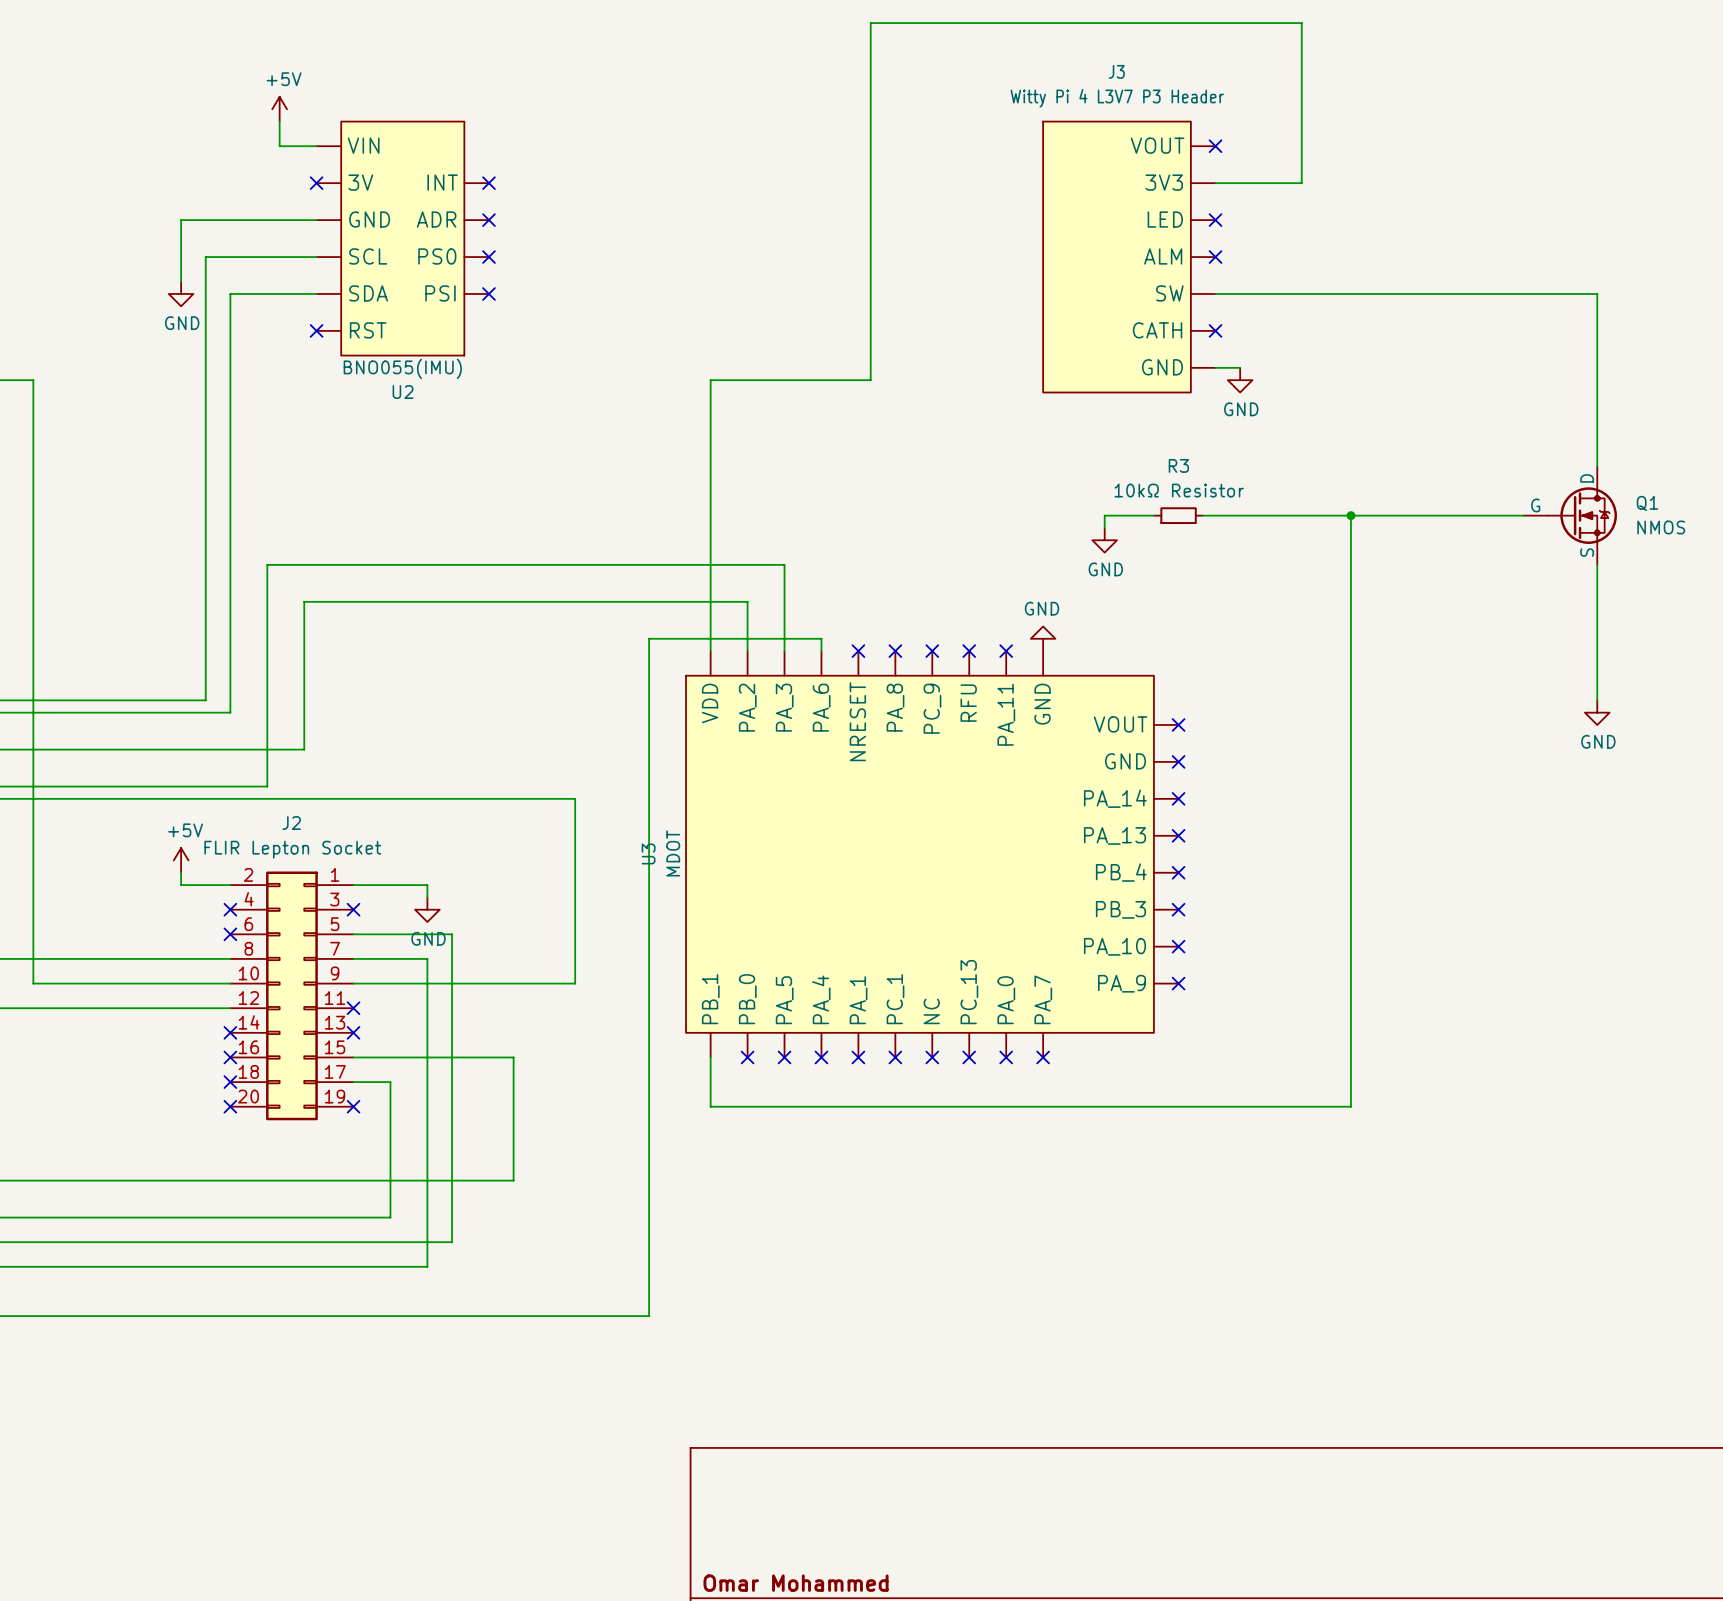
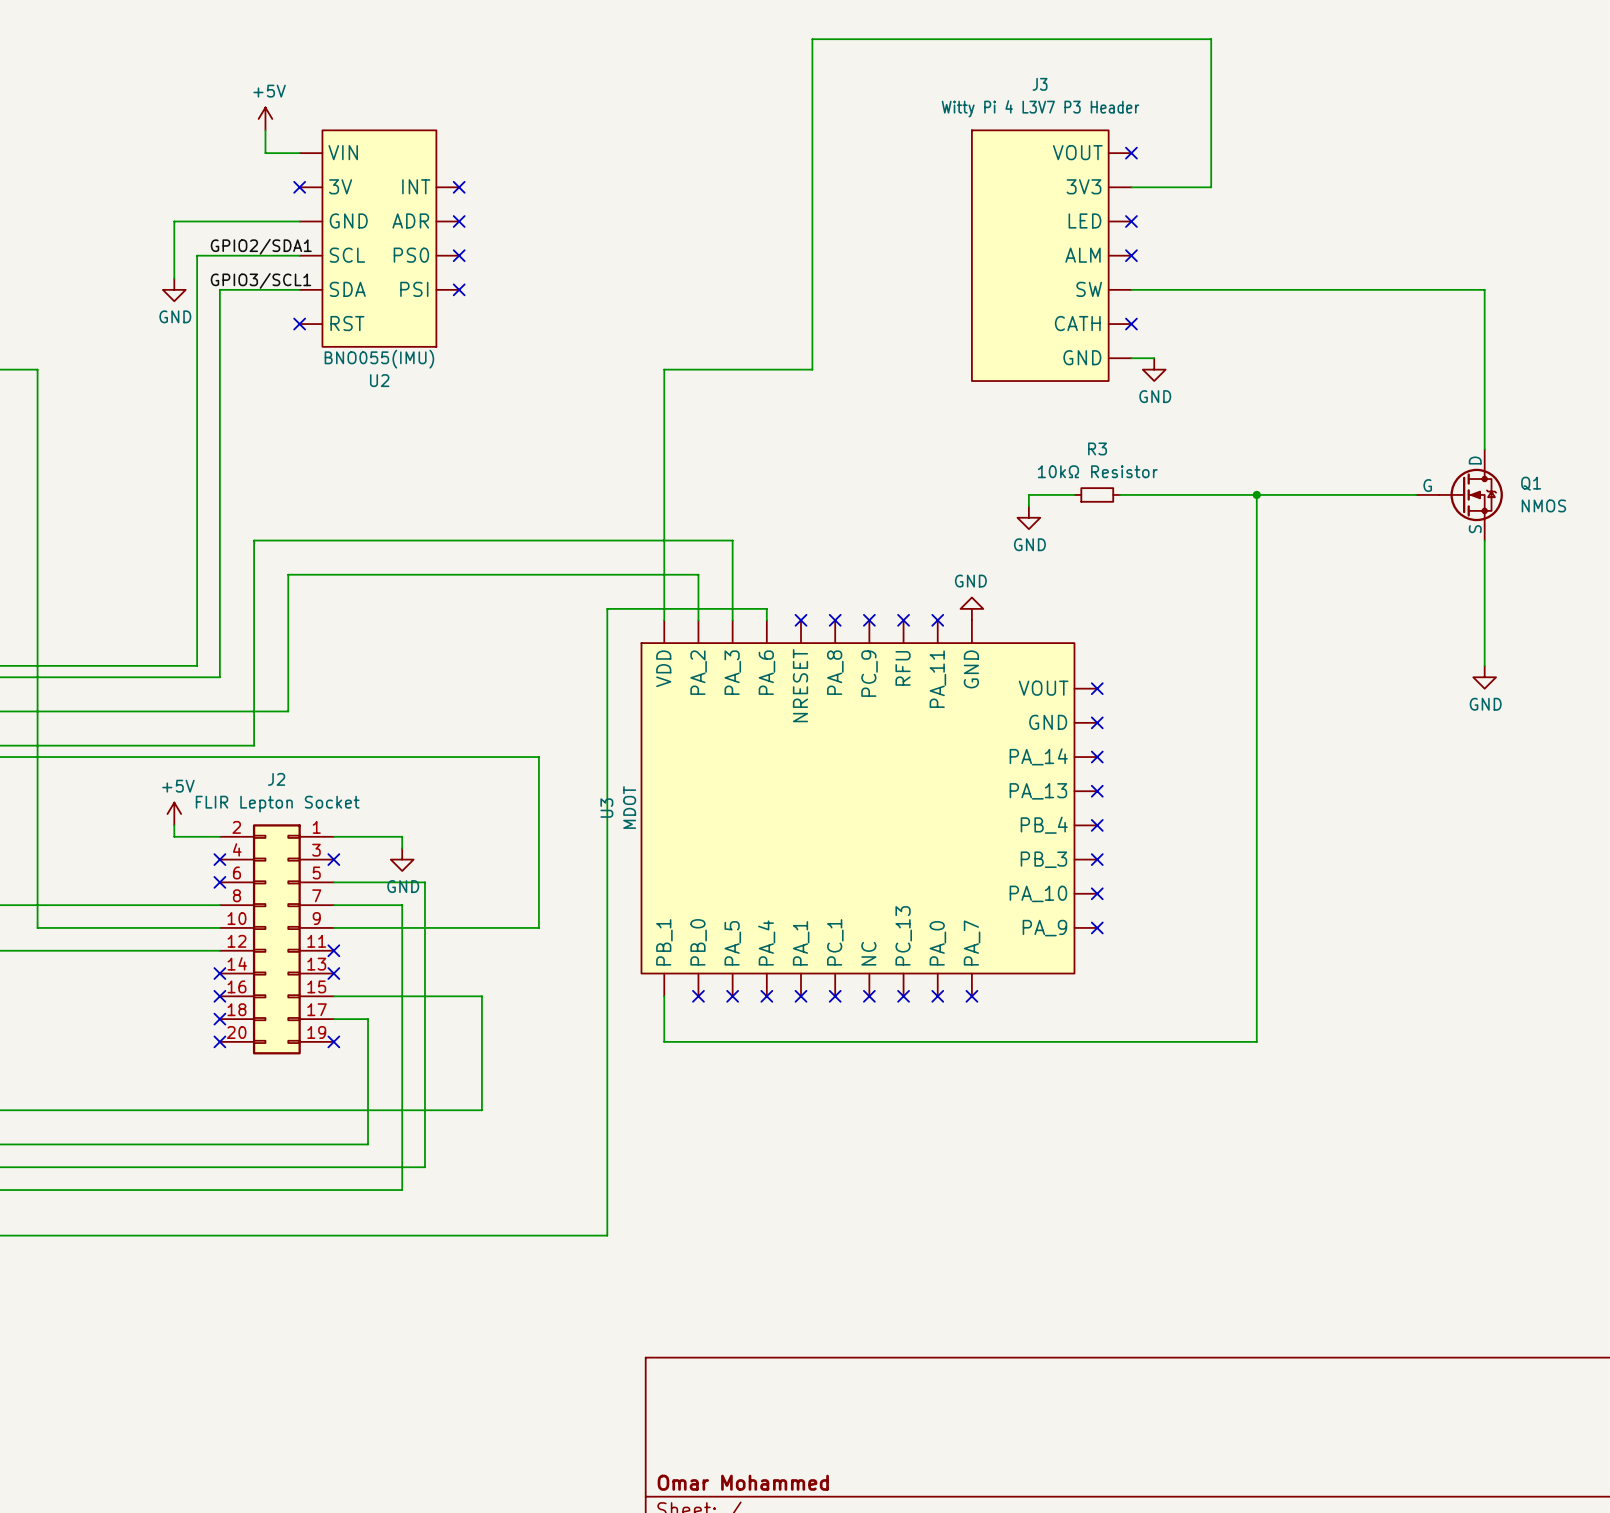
label: none -> GPIO2/SDA1 (261, 246)
label: none -> GPIO3/SCL1 (260, 280)

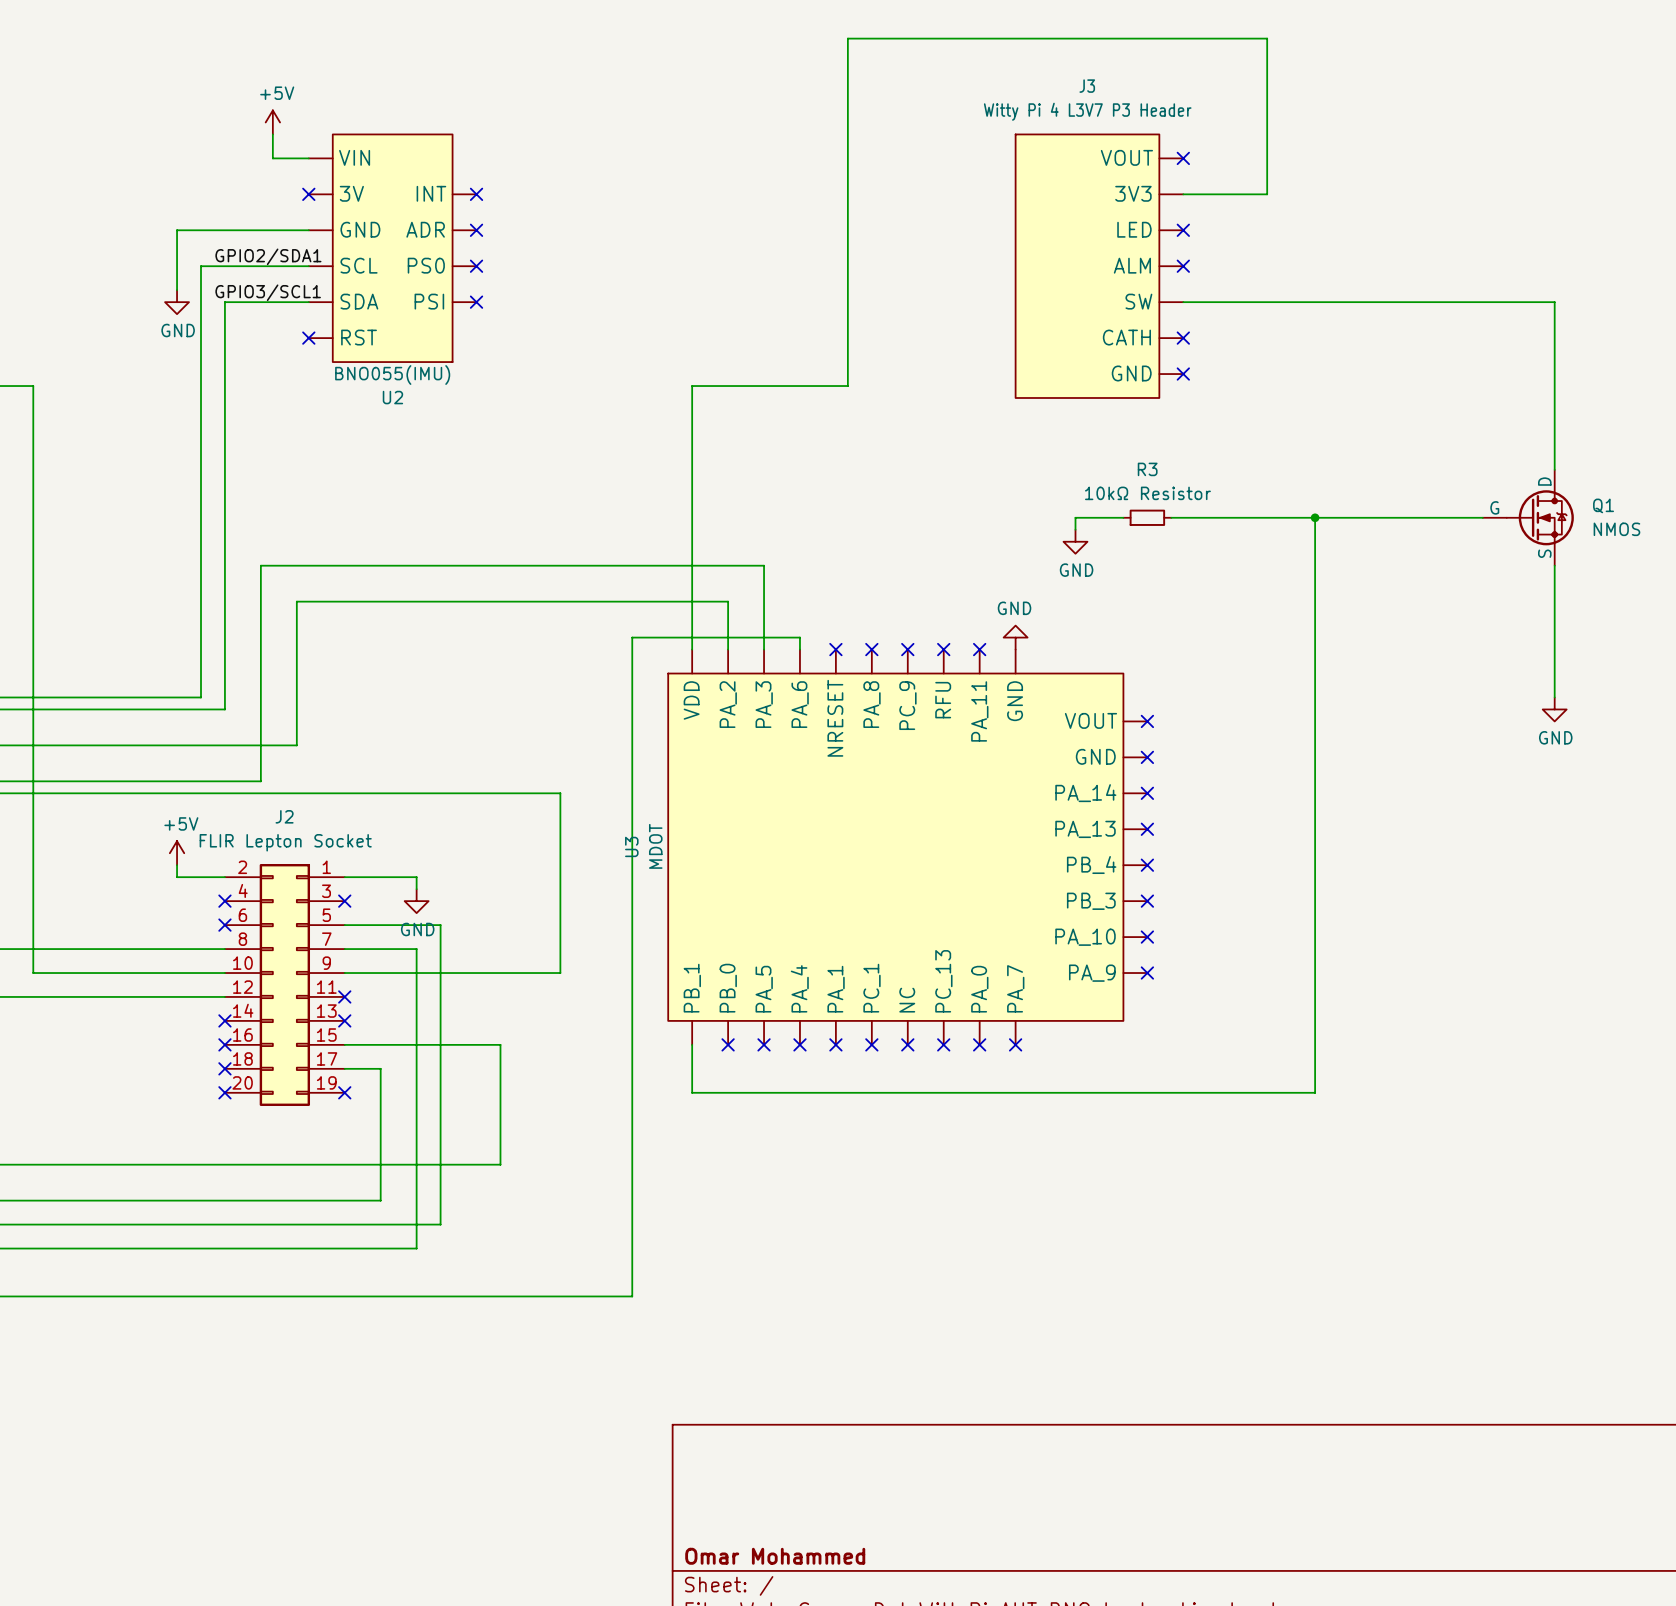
wire: (1131, 358) (1154, 358) -> none
no-connect mark: none -> (1183, 374)
power symbol: GND (1154, 369) -> none

